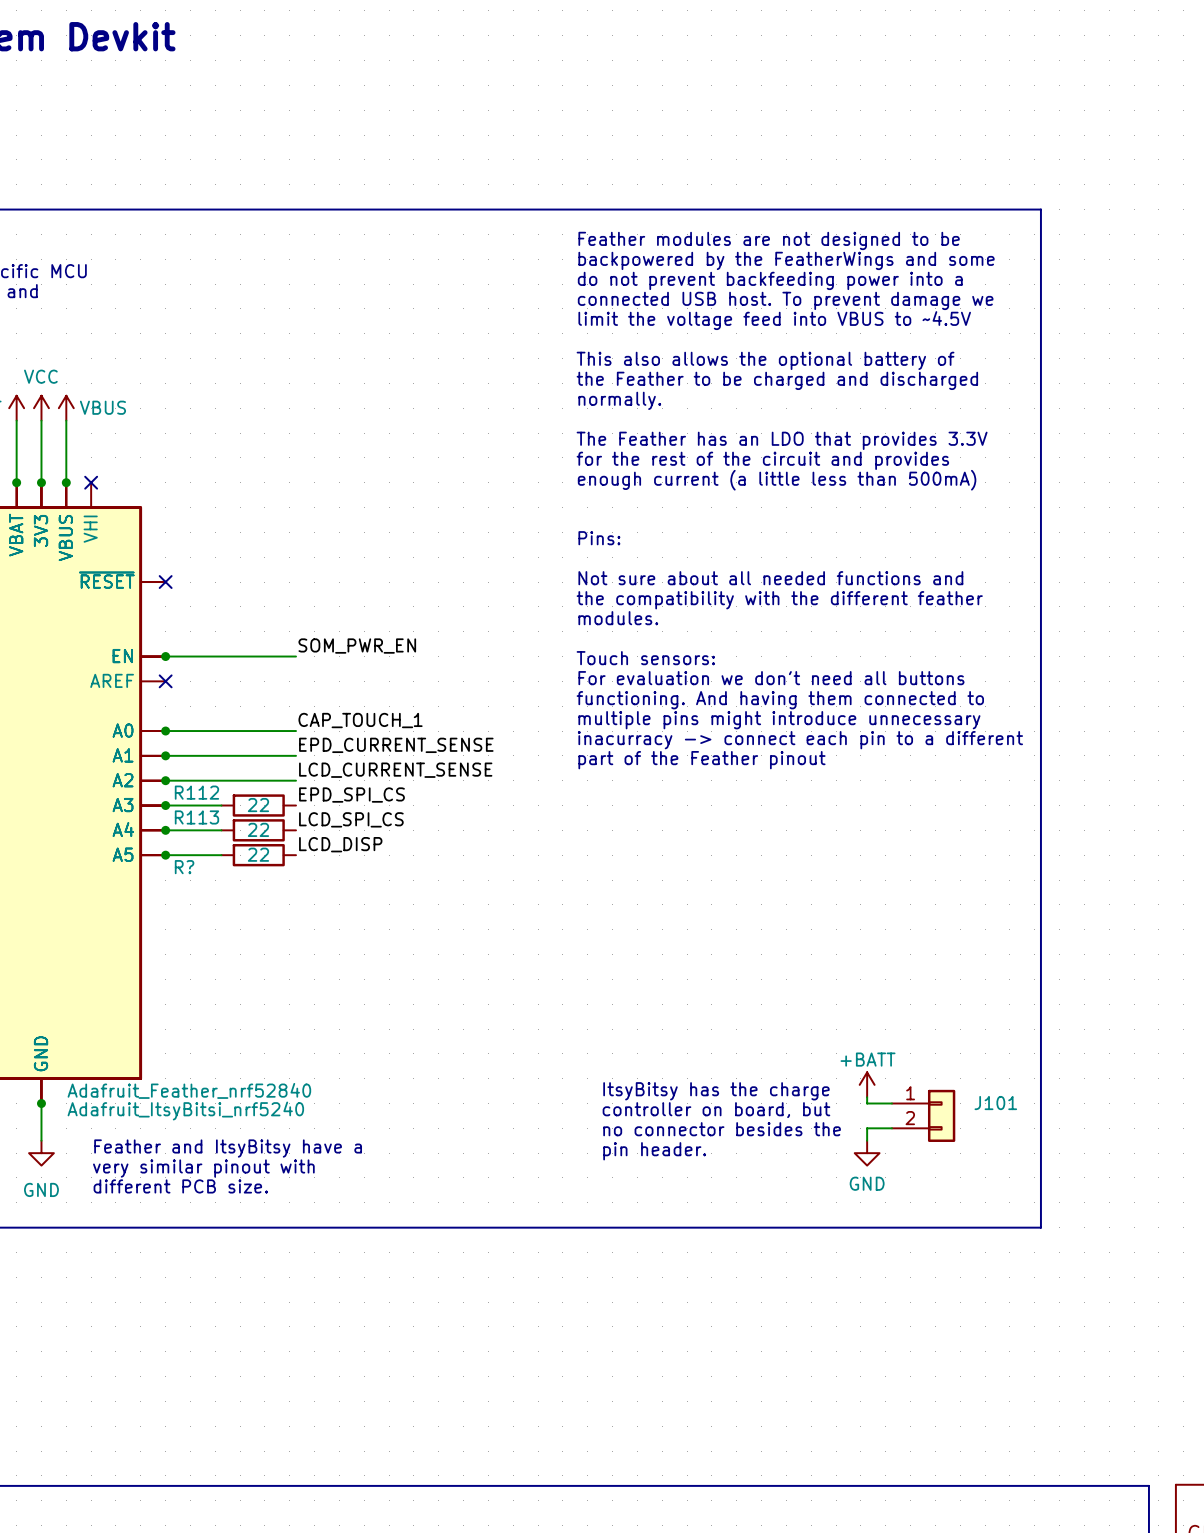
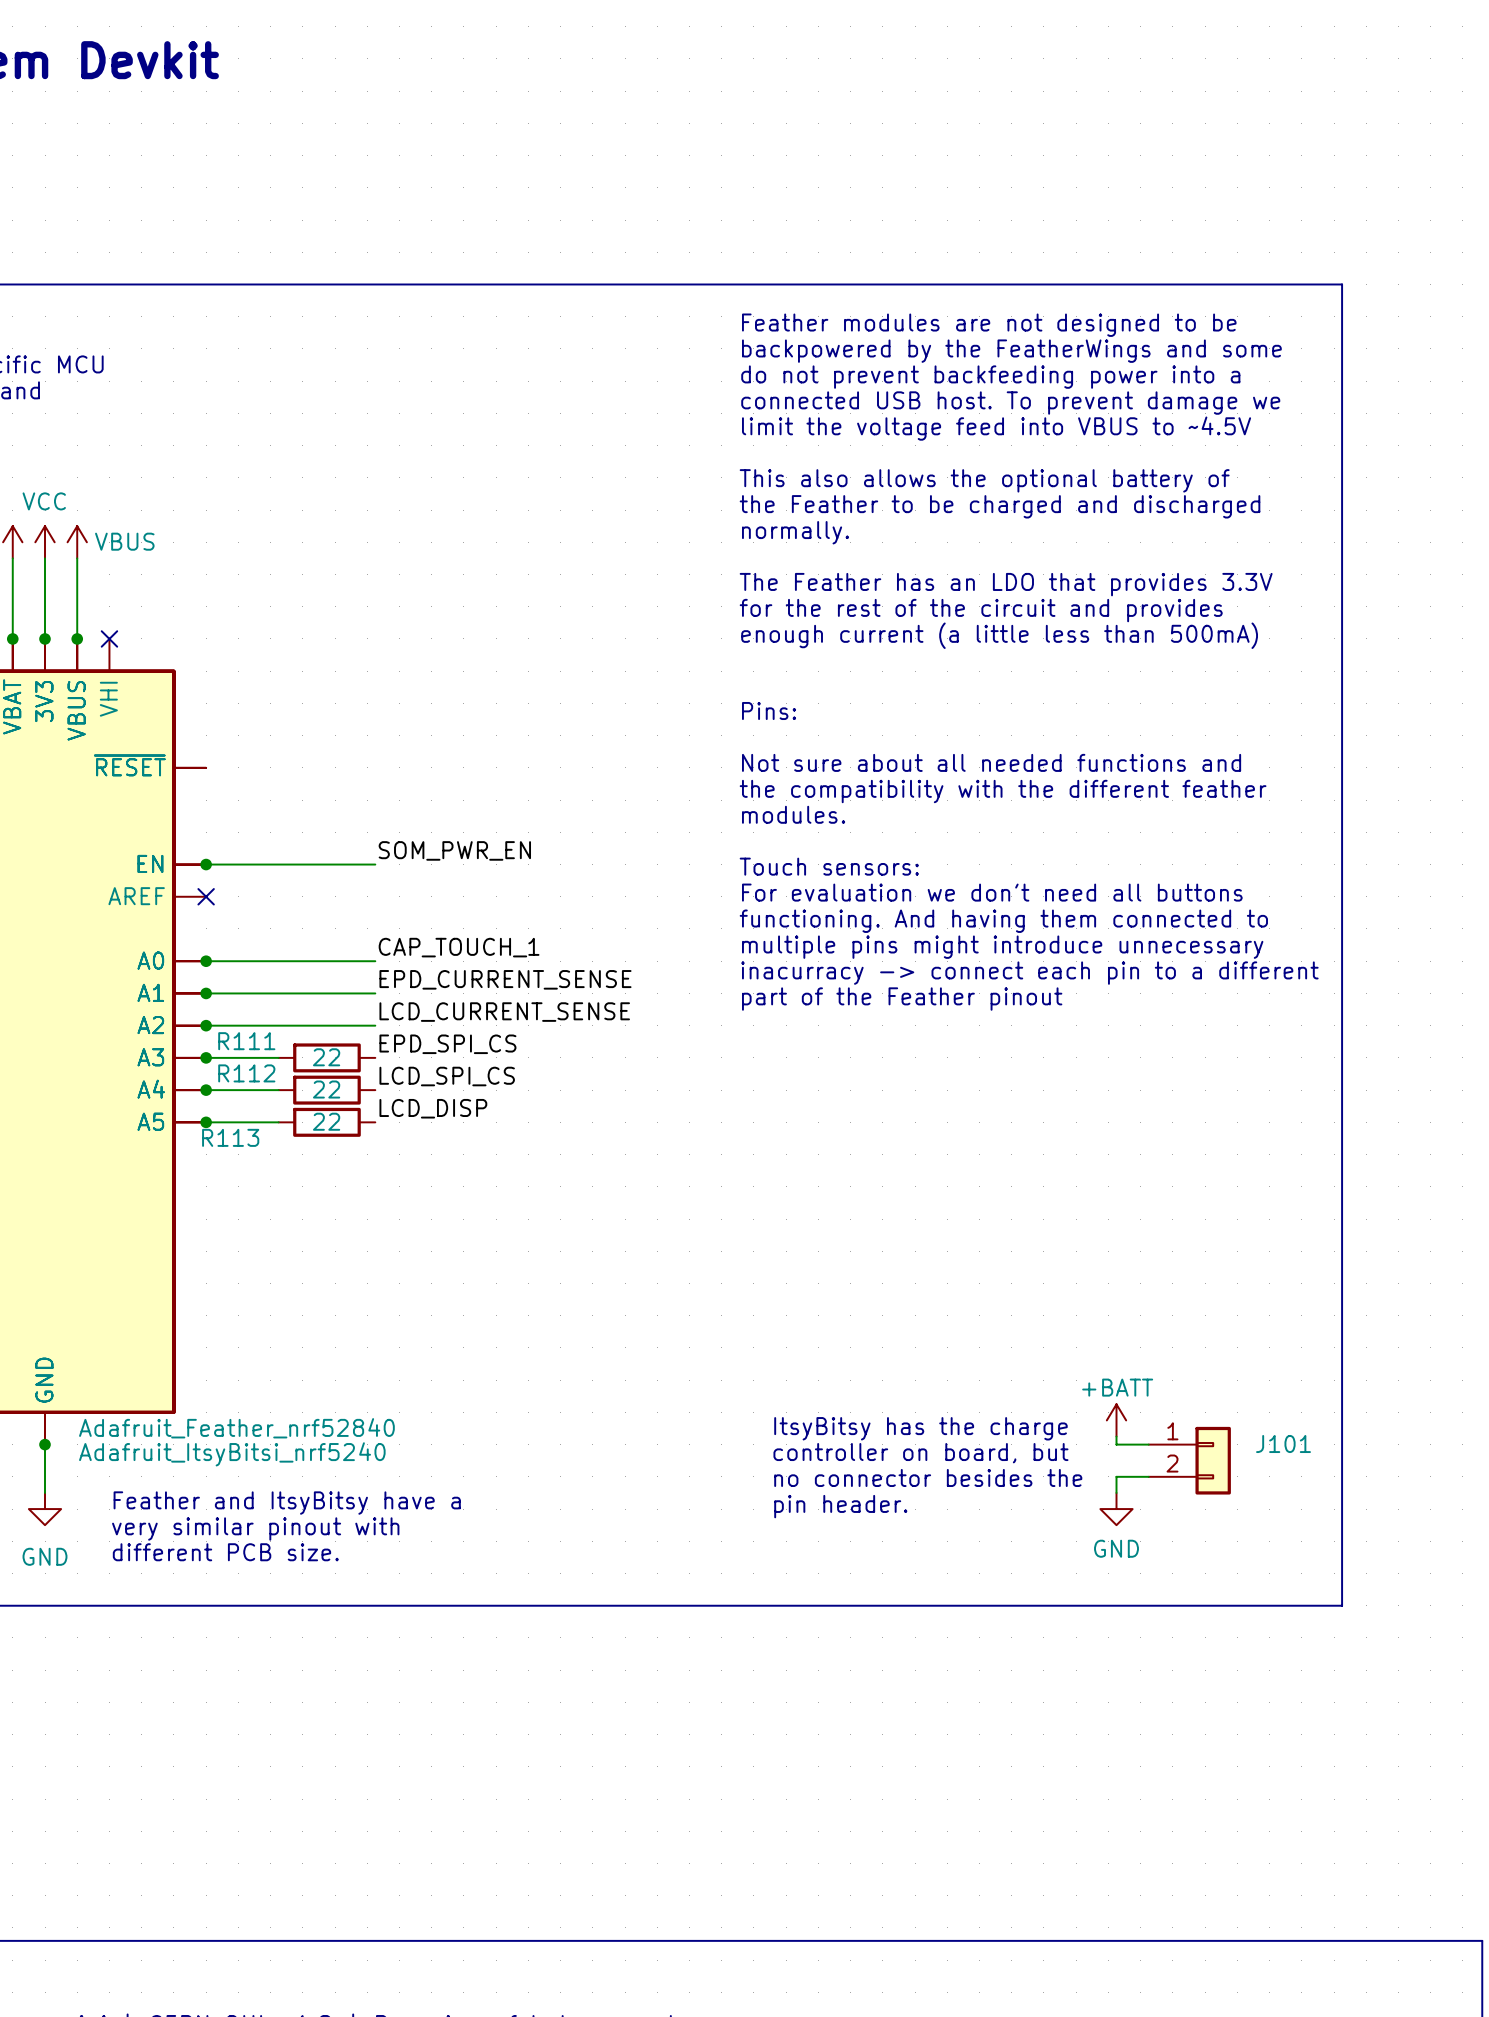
no-connect mark: (165, 582) -> none
R112 name: R112 (196, 792) -> R111 (246, 1041)
R113 name: R113 (196, 817) -> R112 (246, 1073)
R? name: R? (184, 867) -> R113 (230, 1137)

